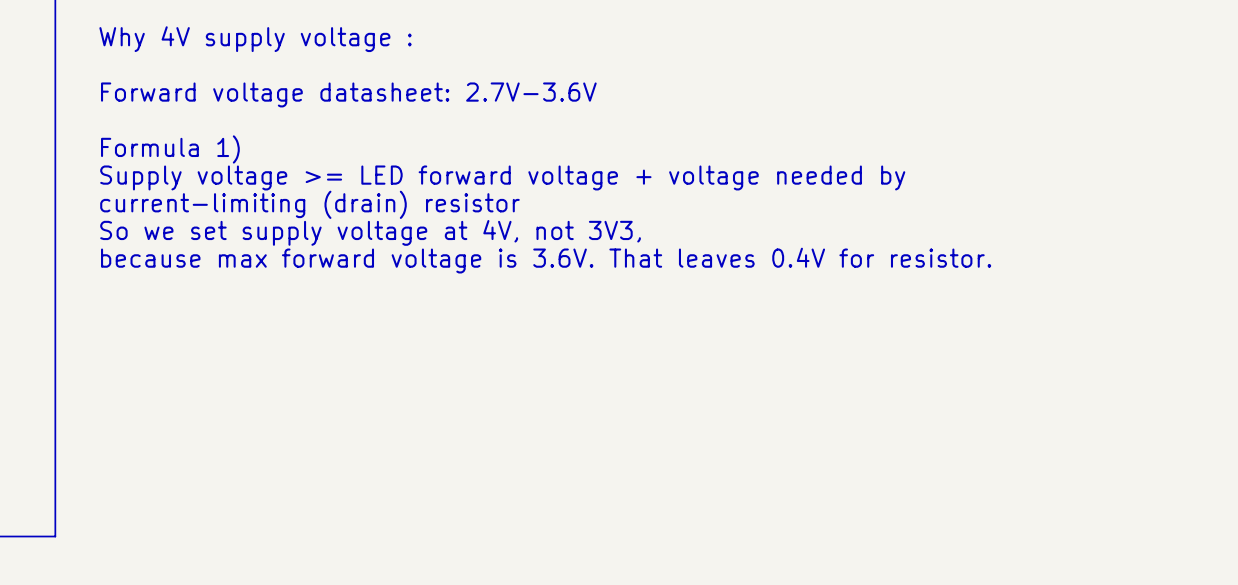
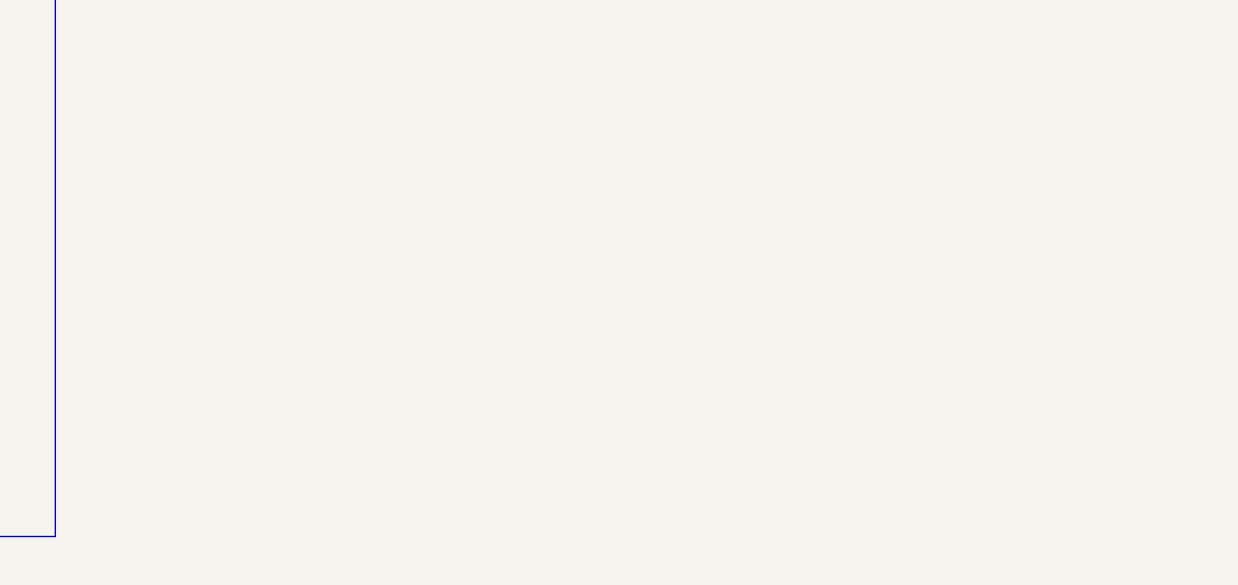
text: Why 4V supply voltage : (255, 39) -> none
text: Forward voltage datasheet: 2.7V-3.6V (348, 94) -> none
text: Formula 1) (170, 149) -> none
text: Supply voltage >= LED forward voltage + voltage needed by (502, 177) -> none
text: current-limiting (drain) resistor (309, 204) -> none
text: So we set supply voltage at 4V, not 3V3, (370, 232) -> none
text: because max forward voltage is 3.6V. That leaves 0.4V for resistor. (546, 260) -> none

